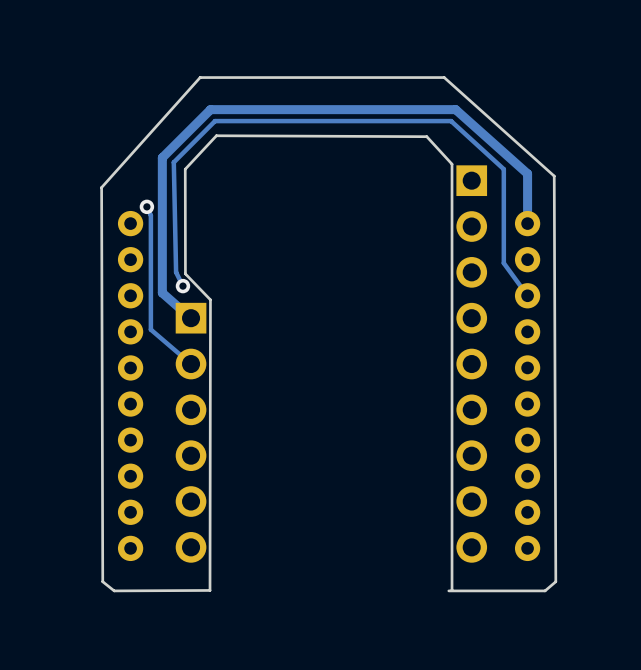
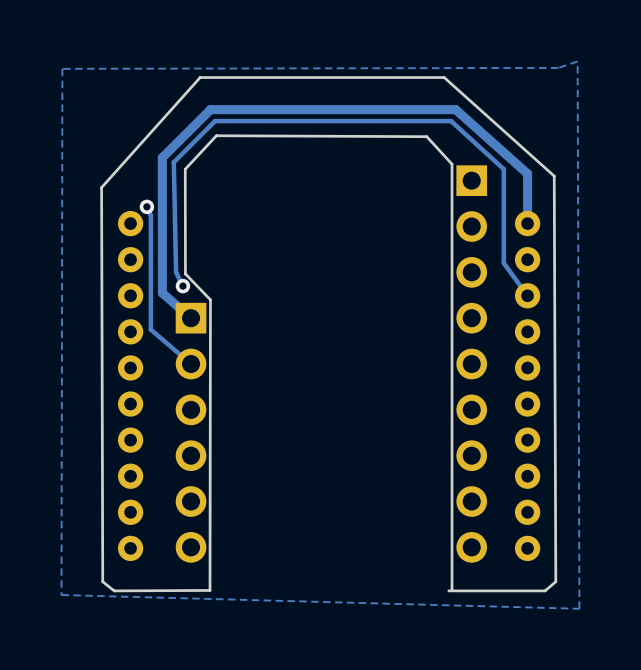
zone outline: none -> (577, 61) (579, 608) (61, 595) (62, 68) (558, 67) (577, 61)

